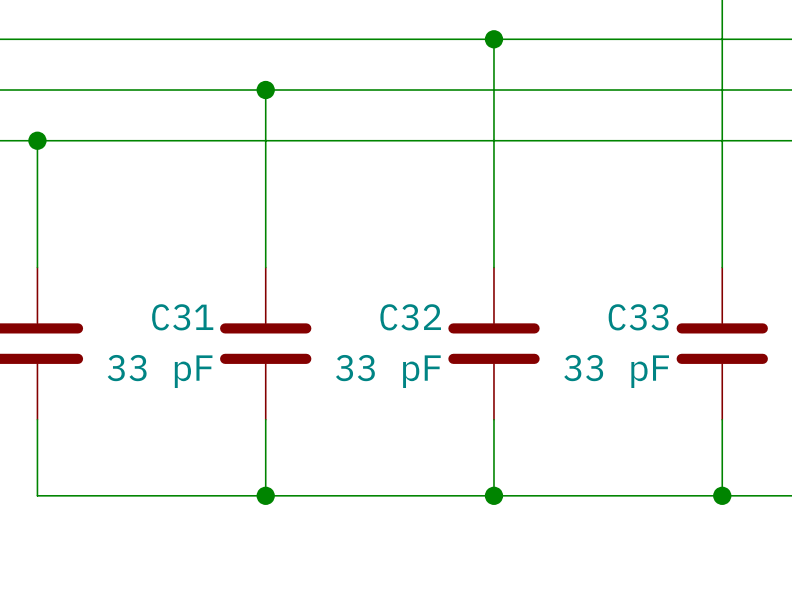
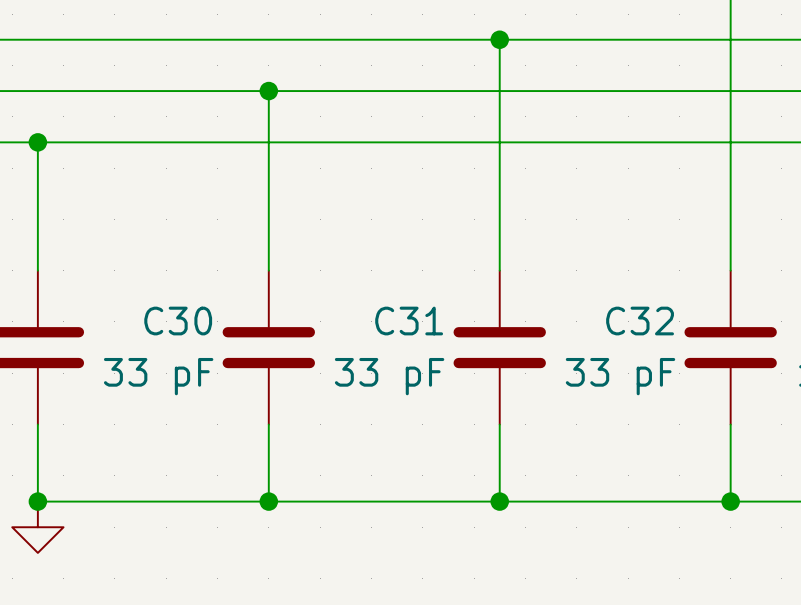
C31 name: C31 (182, 317) -> C30 (178, 321)
C32 name: C32 (410, 317) -> C31 (409, 321)
C33 name: C33 (638, 317) -> C32 (640, 321)
junction: none -> (37, 501)
power symbol: none -> (37, 527)

